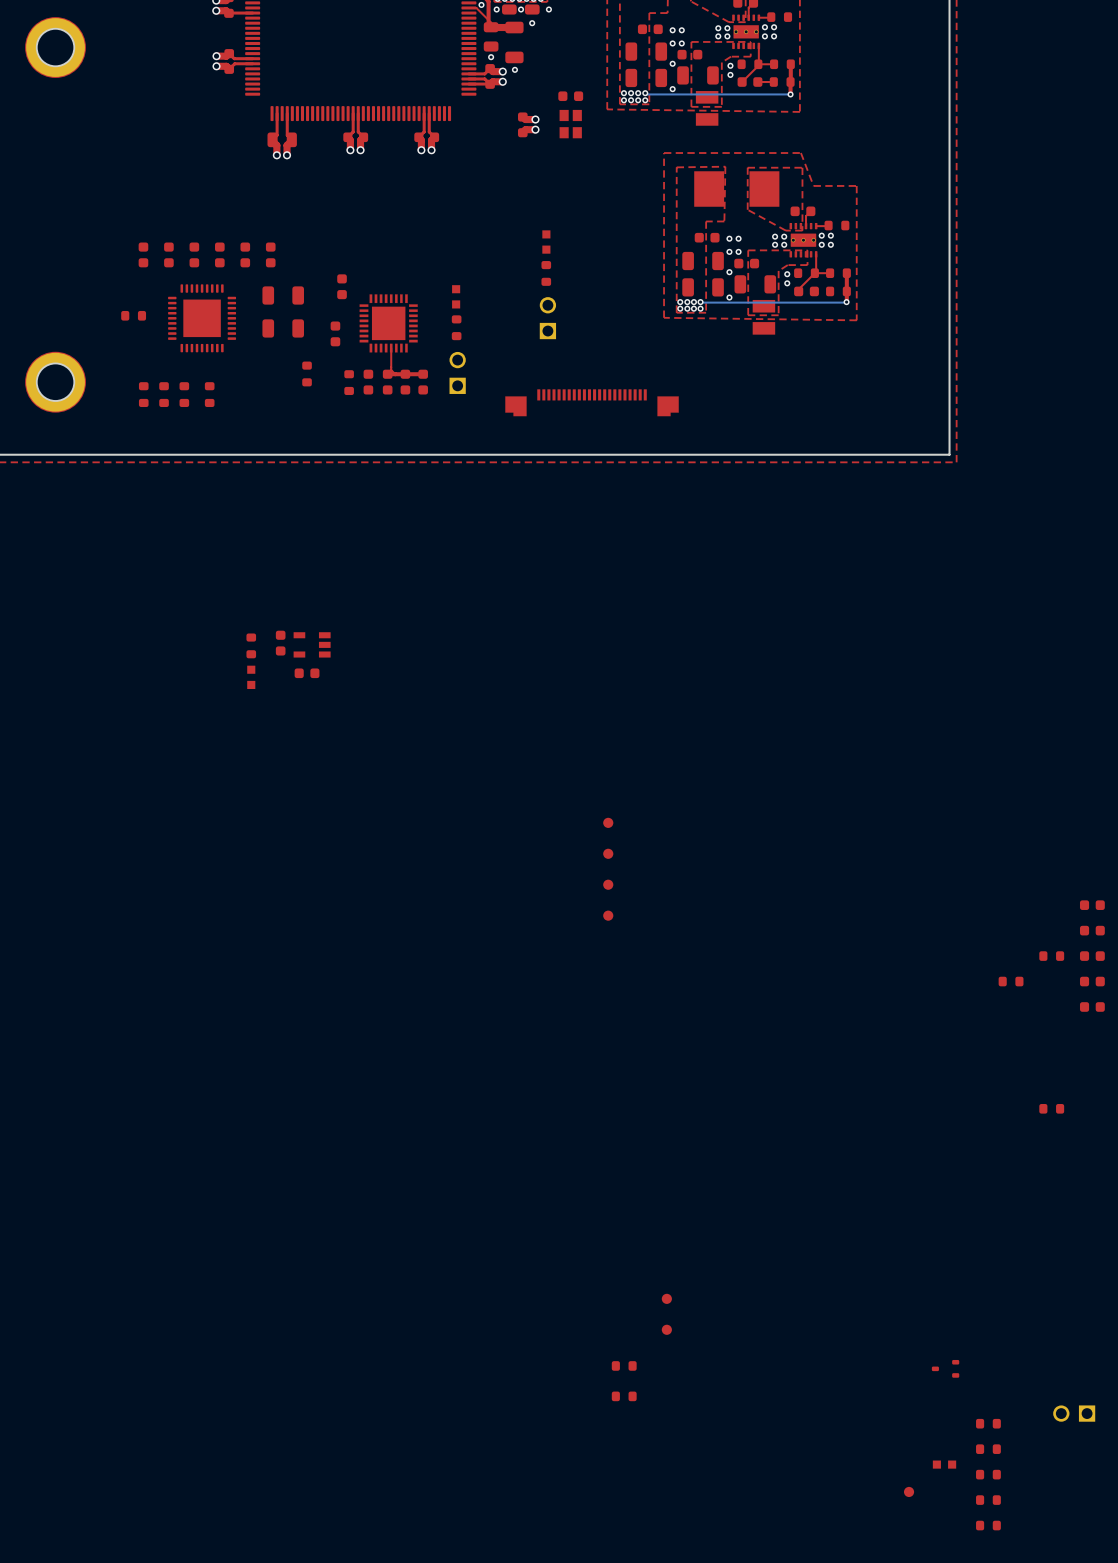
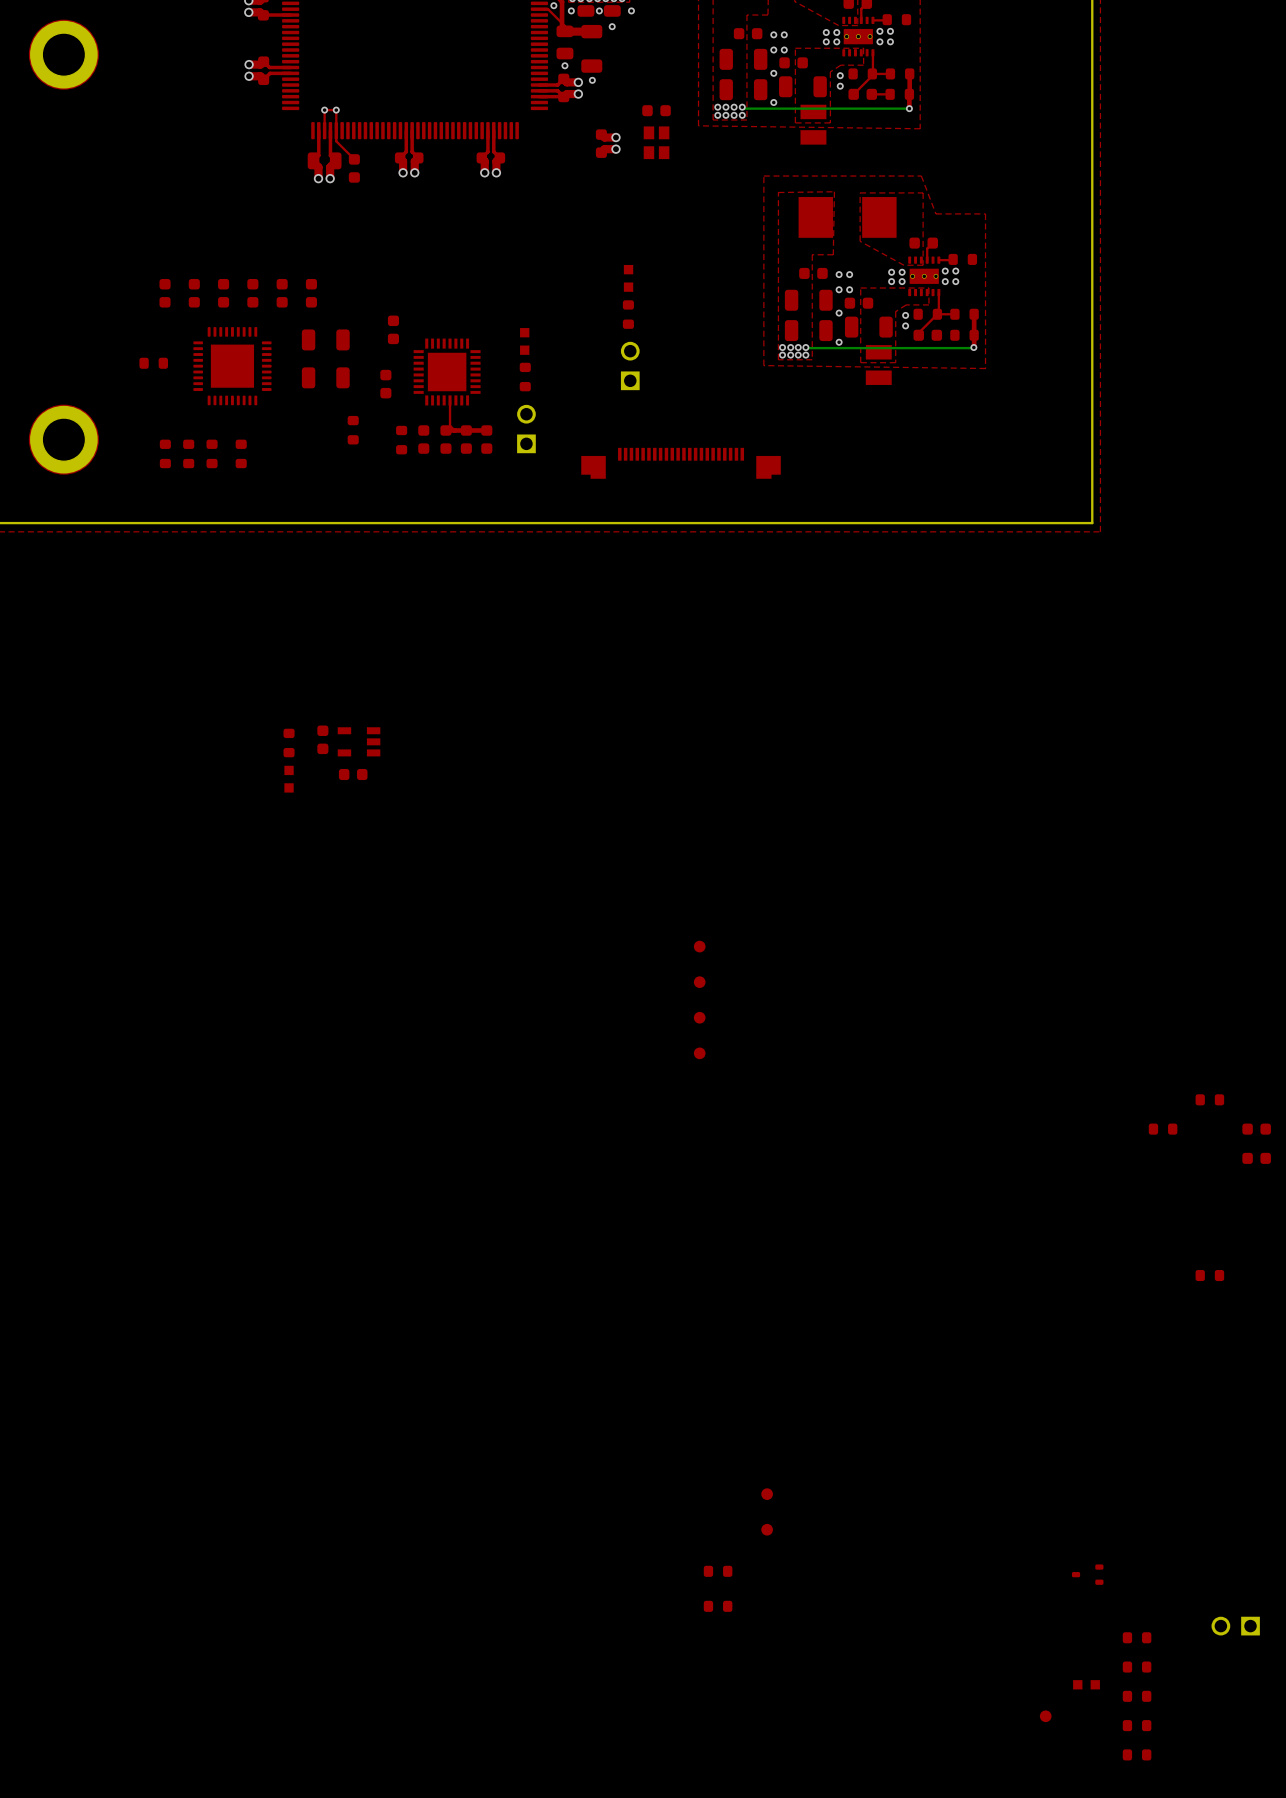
via: none -> (324, 110)
via: none -> (336, 110)
top track: none -> (324, 130) (324, 110) (336, 110) (336, 141) (354, 159)
part: none -> (354, 168)
part: (1092, 905) -> none
part: (1092, 930) -> none
part: (1092, 956) -> none

